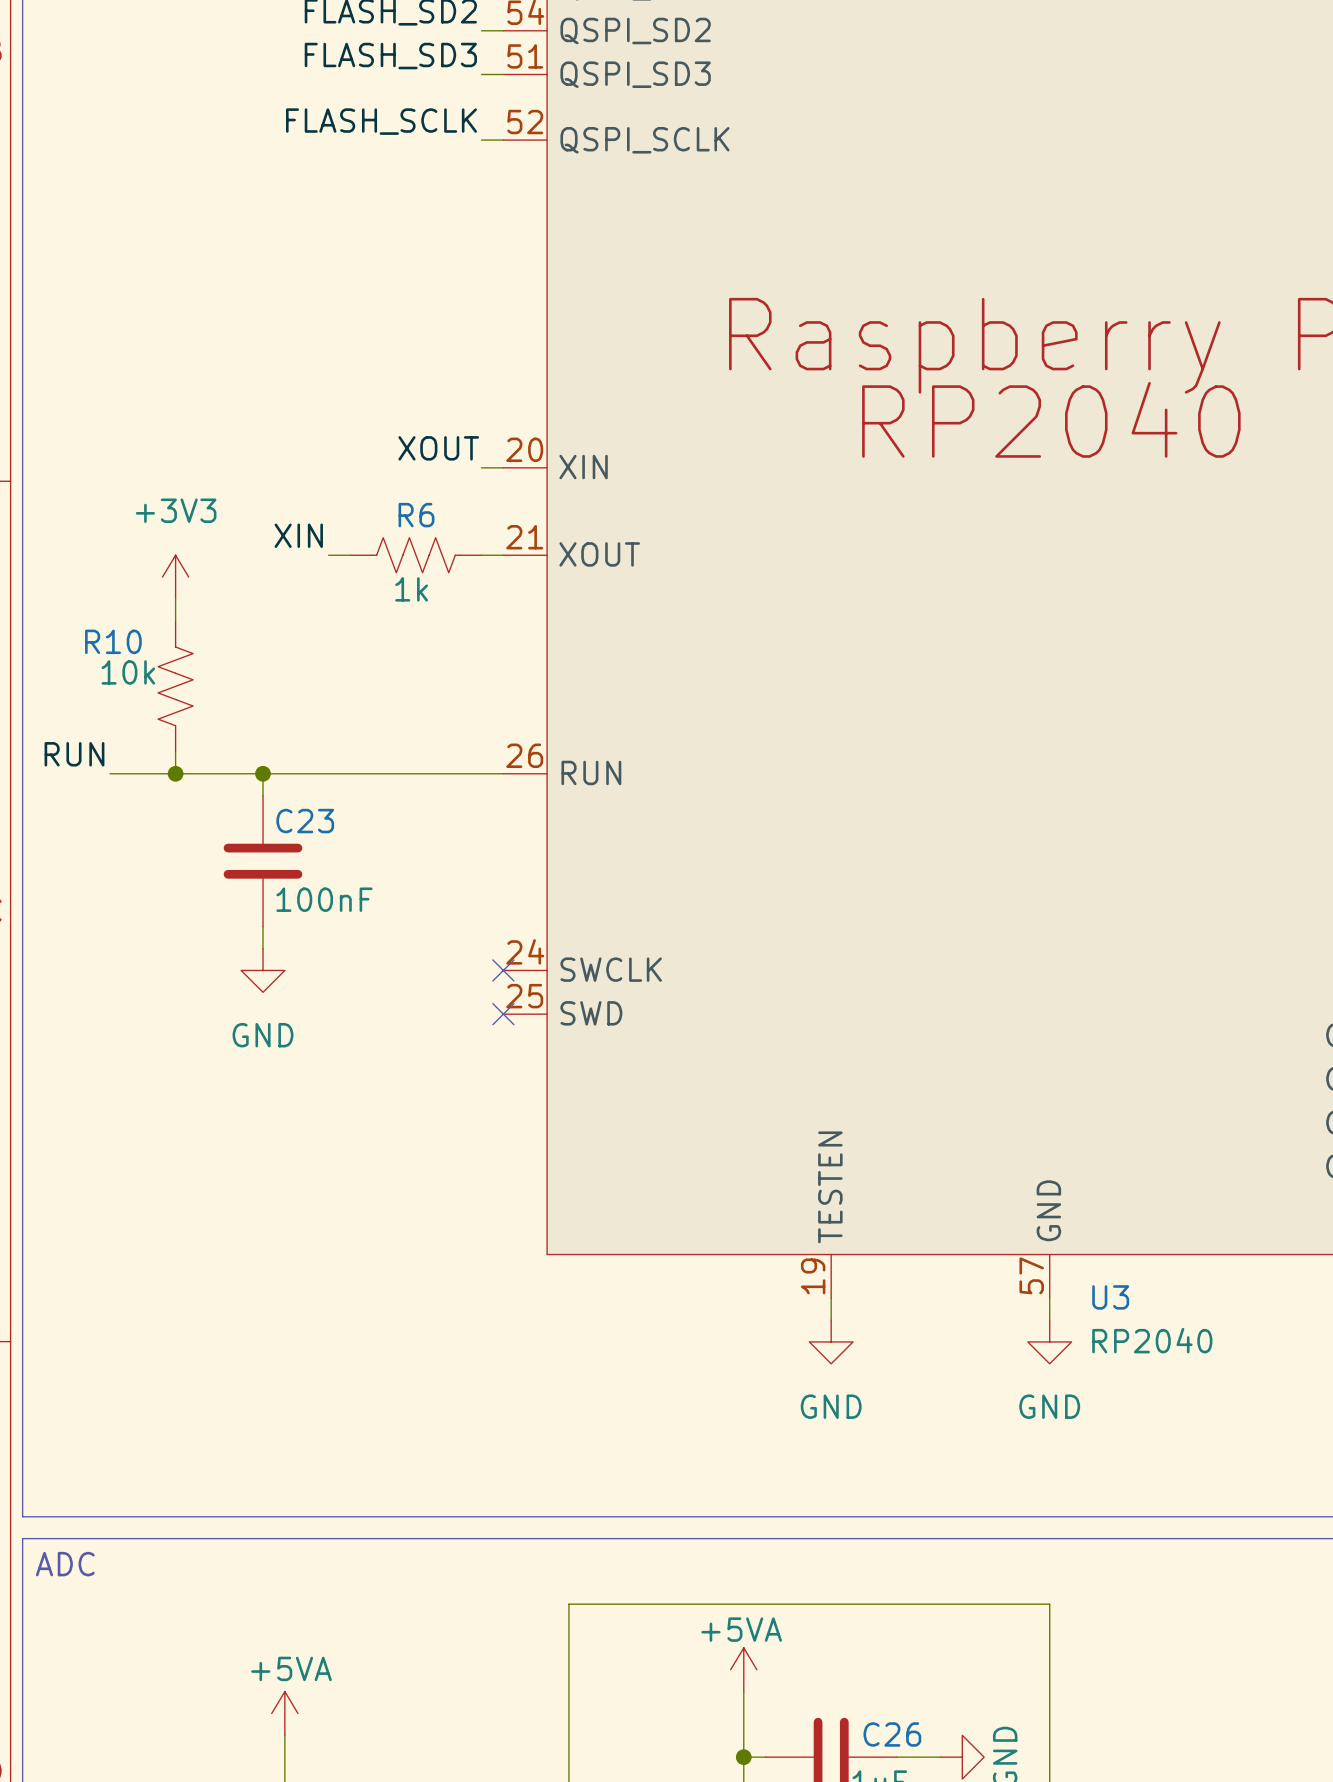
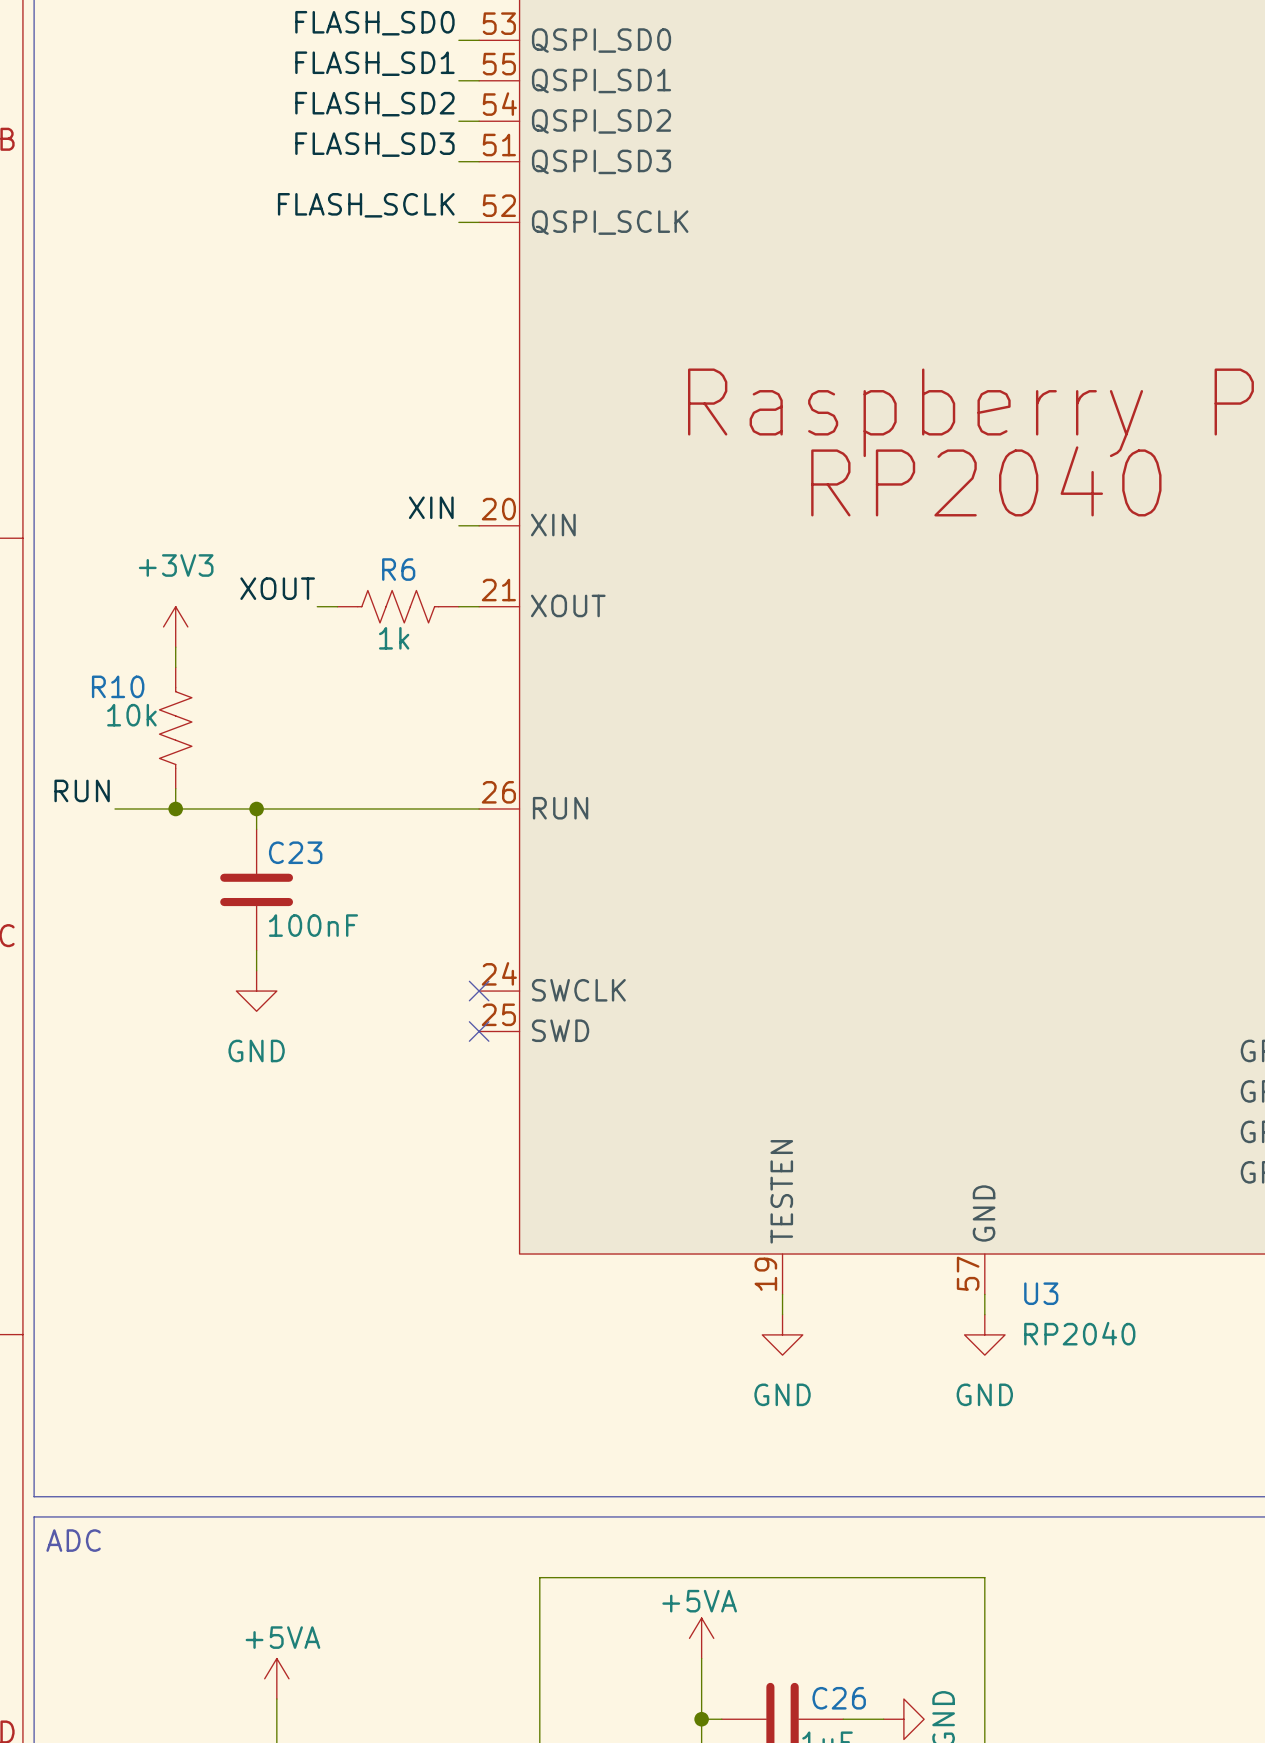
label: XOUT (438, 448) -> XIN (431, 507)
label: XIN (298, 535) -> XOUT (277, 588)

